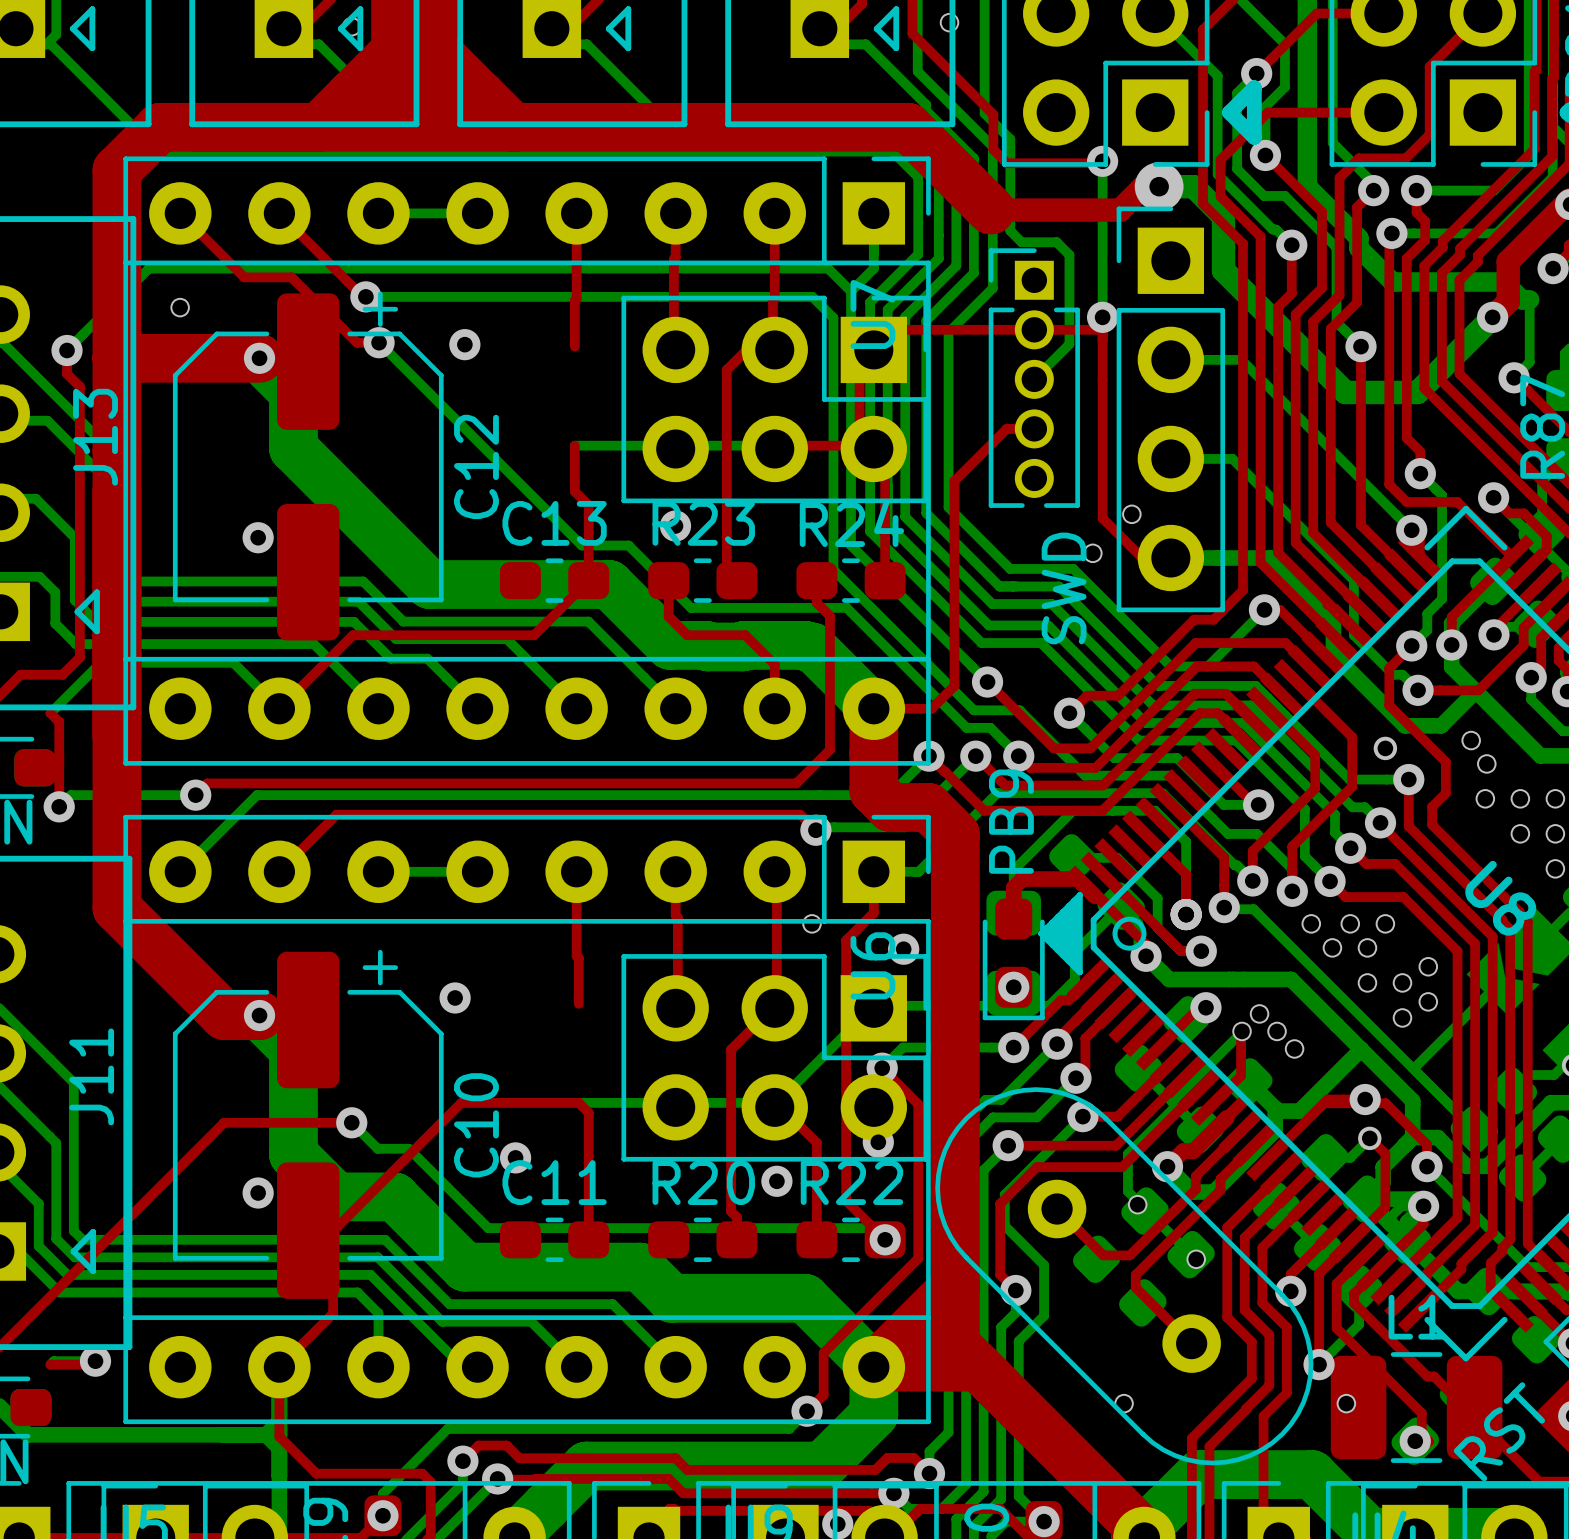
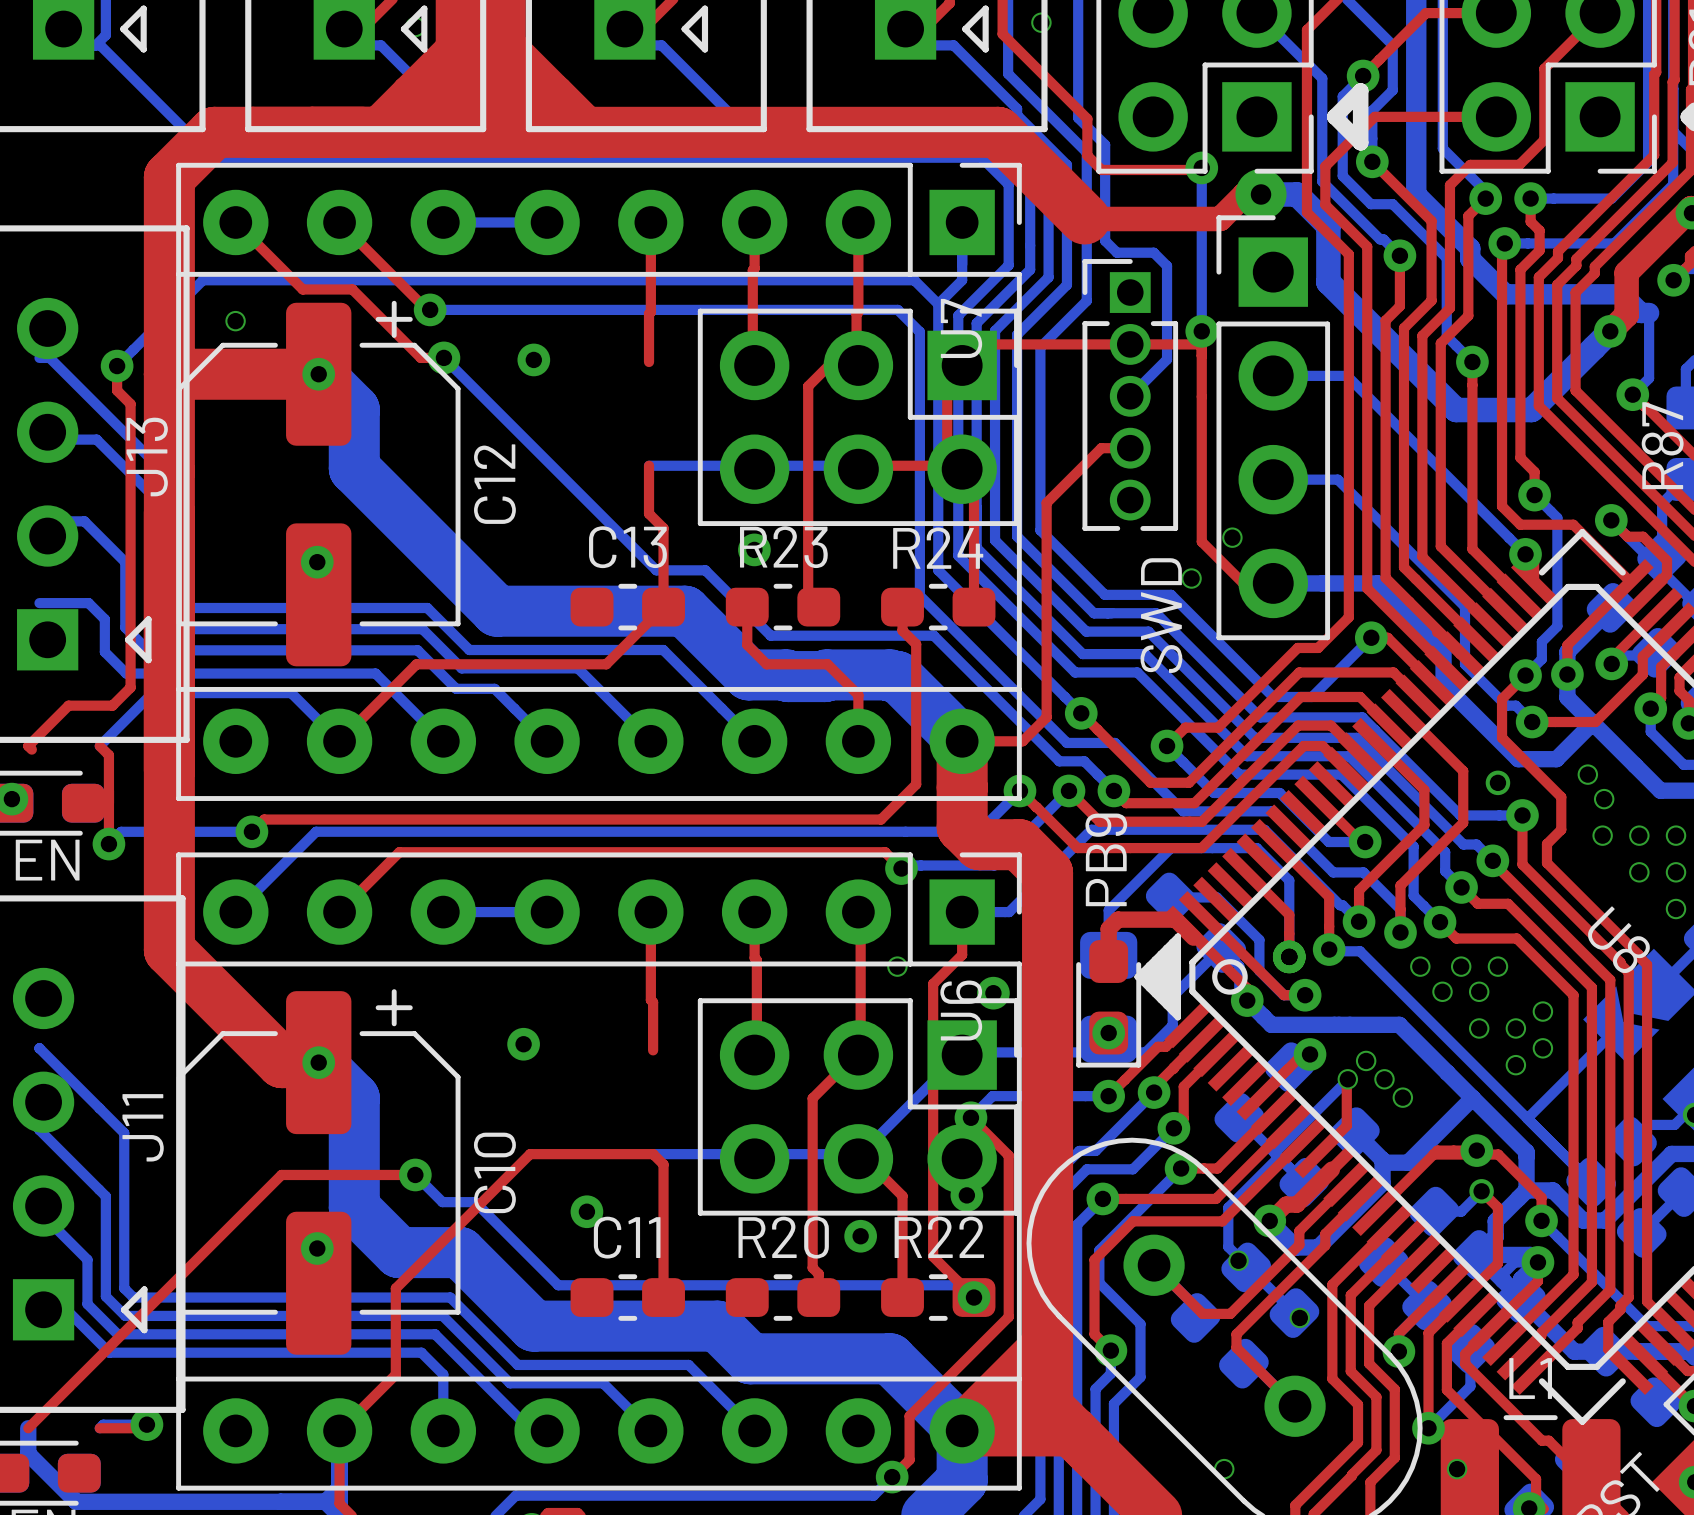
C12 position: (308, 466) -> (318, 483)
C10 position: (308, 1124) -> (318, 1171)

